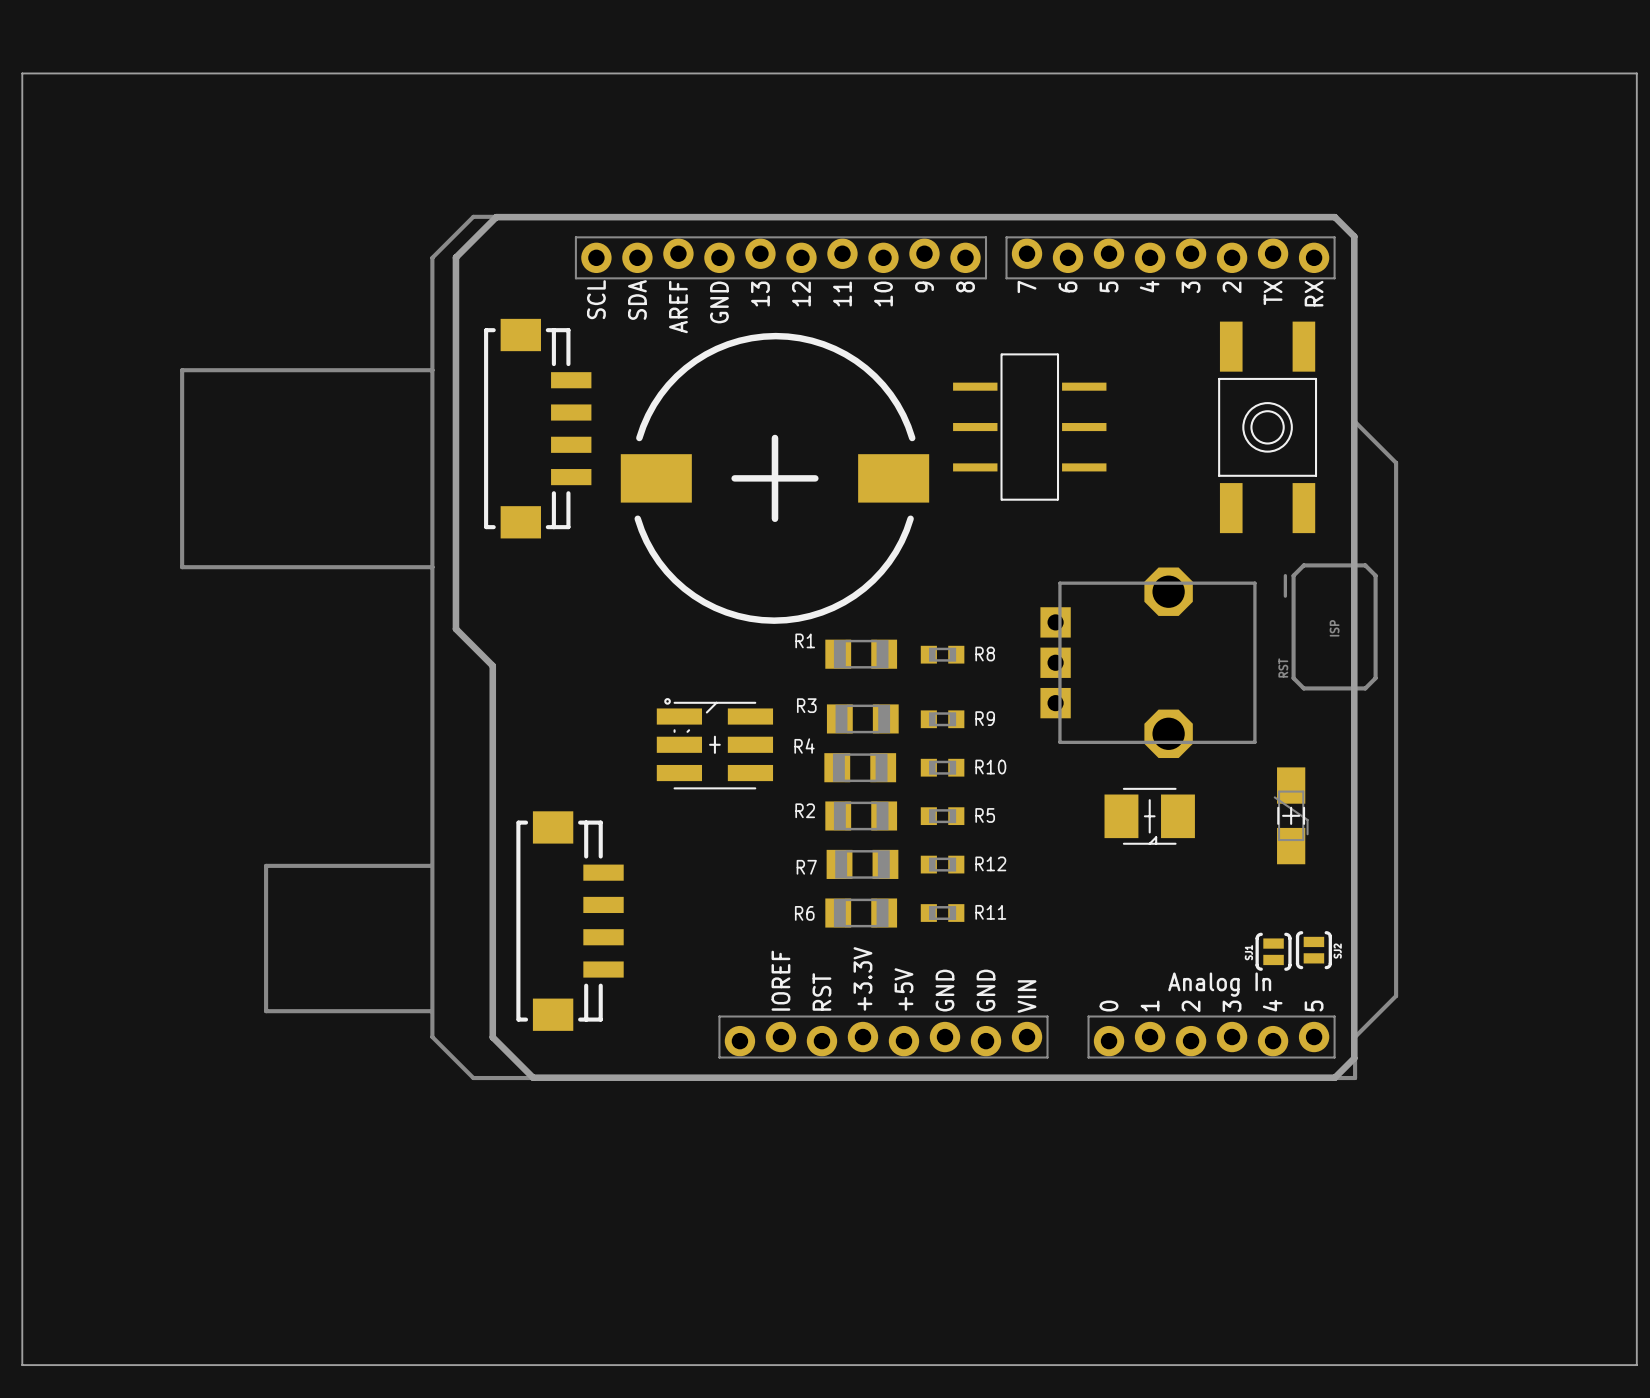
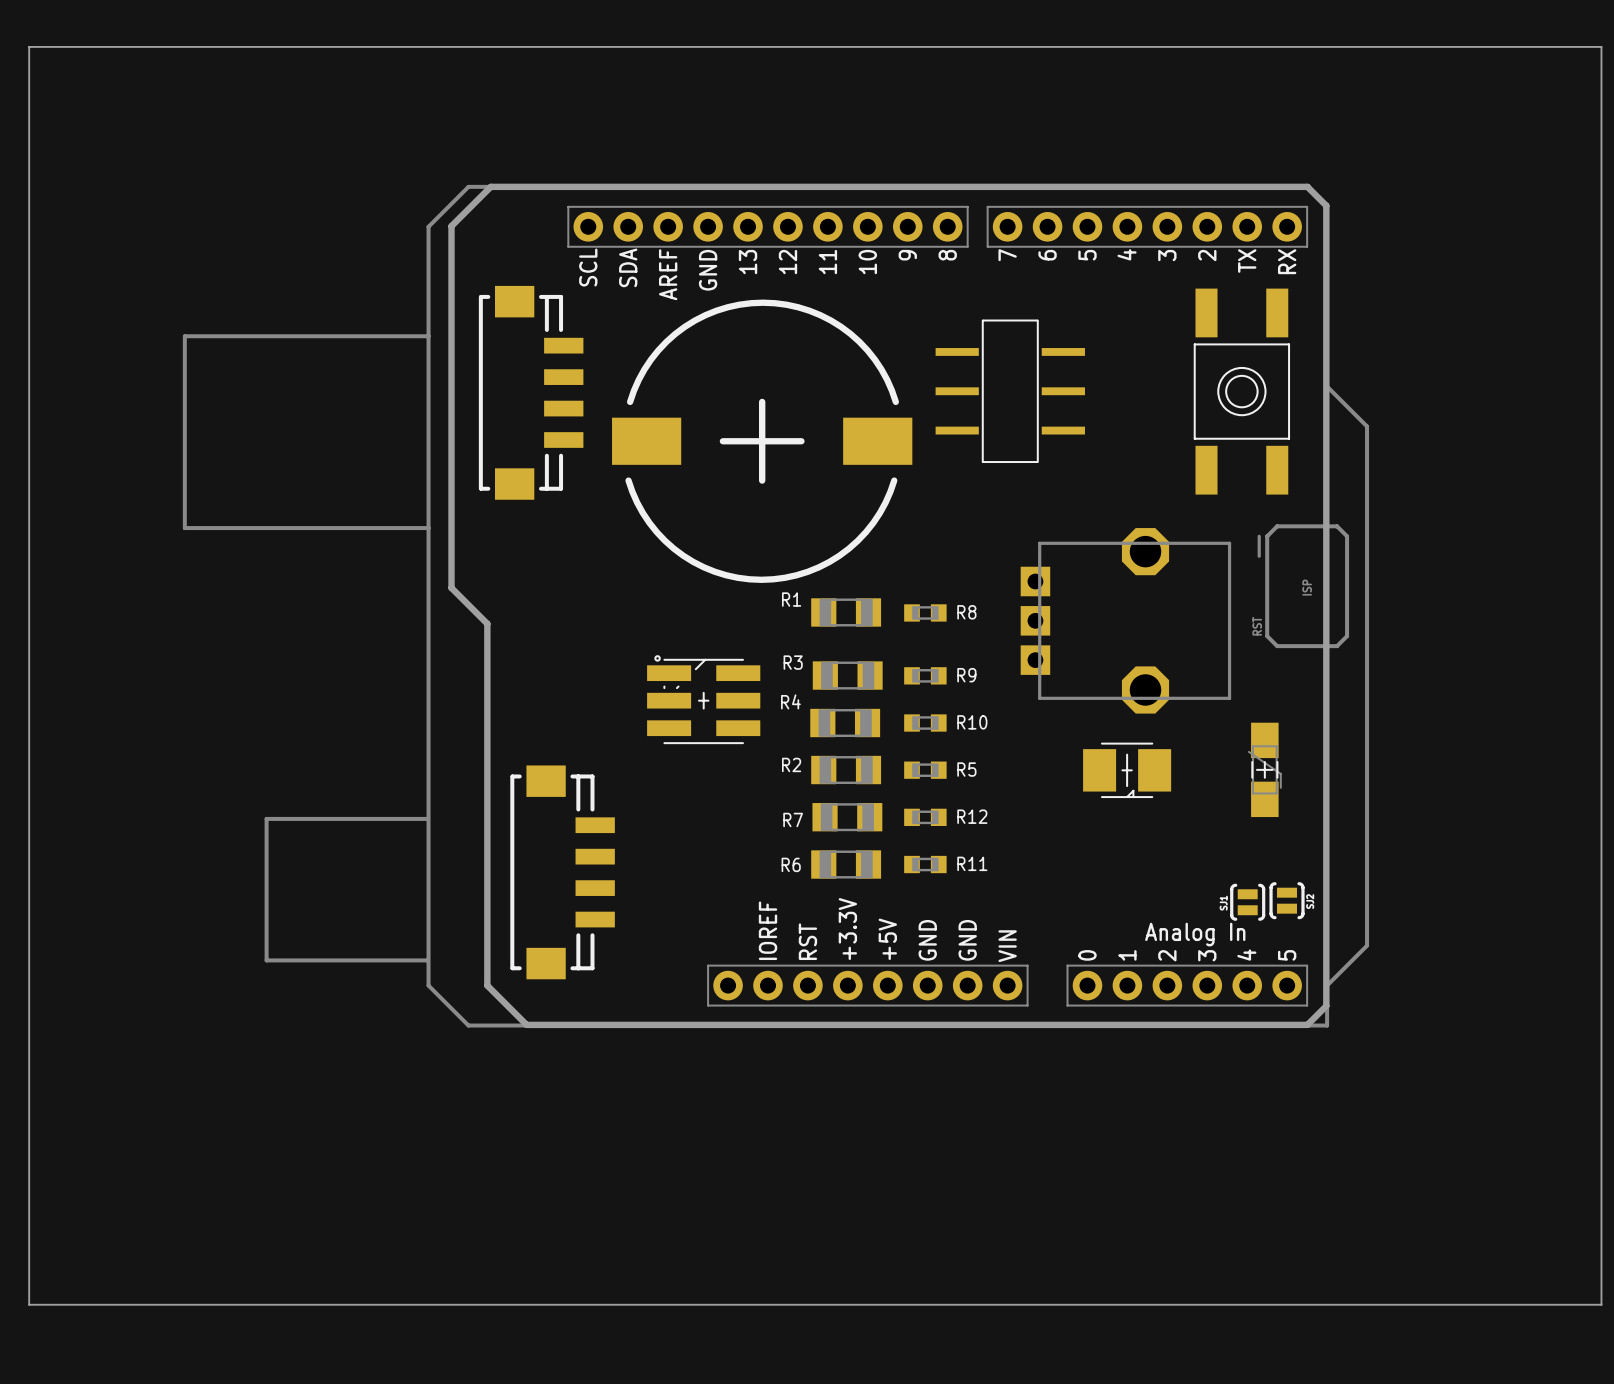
part footprint: [180, 214, 1399, 1081] -> [182, 184, 1370, 1028]

